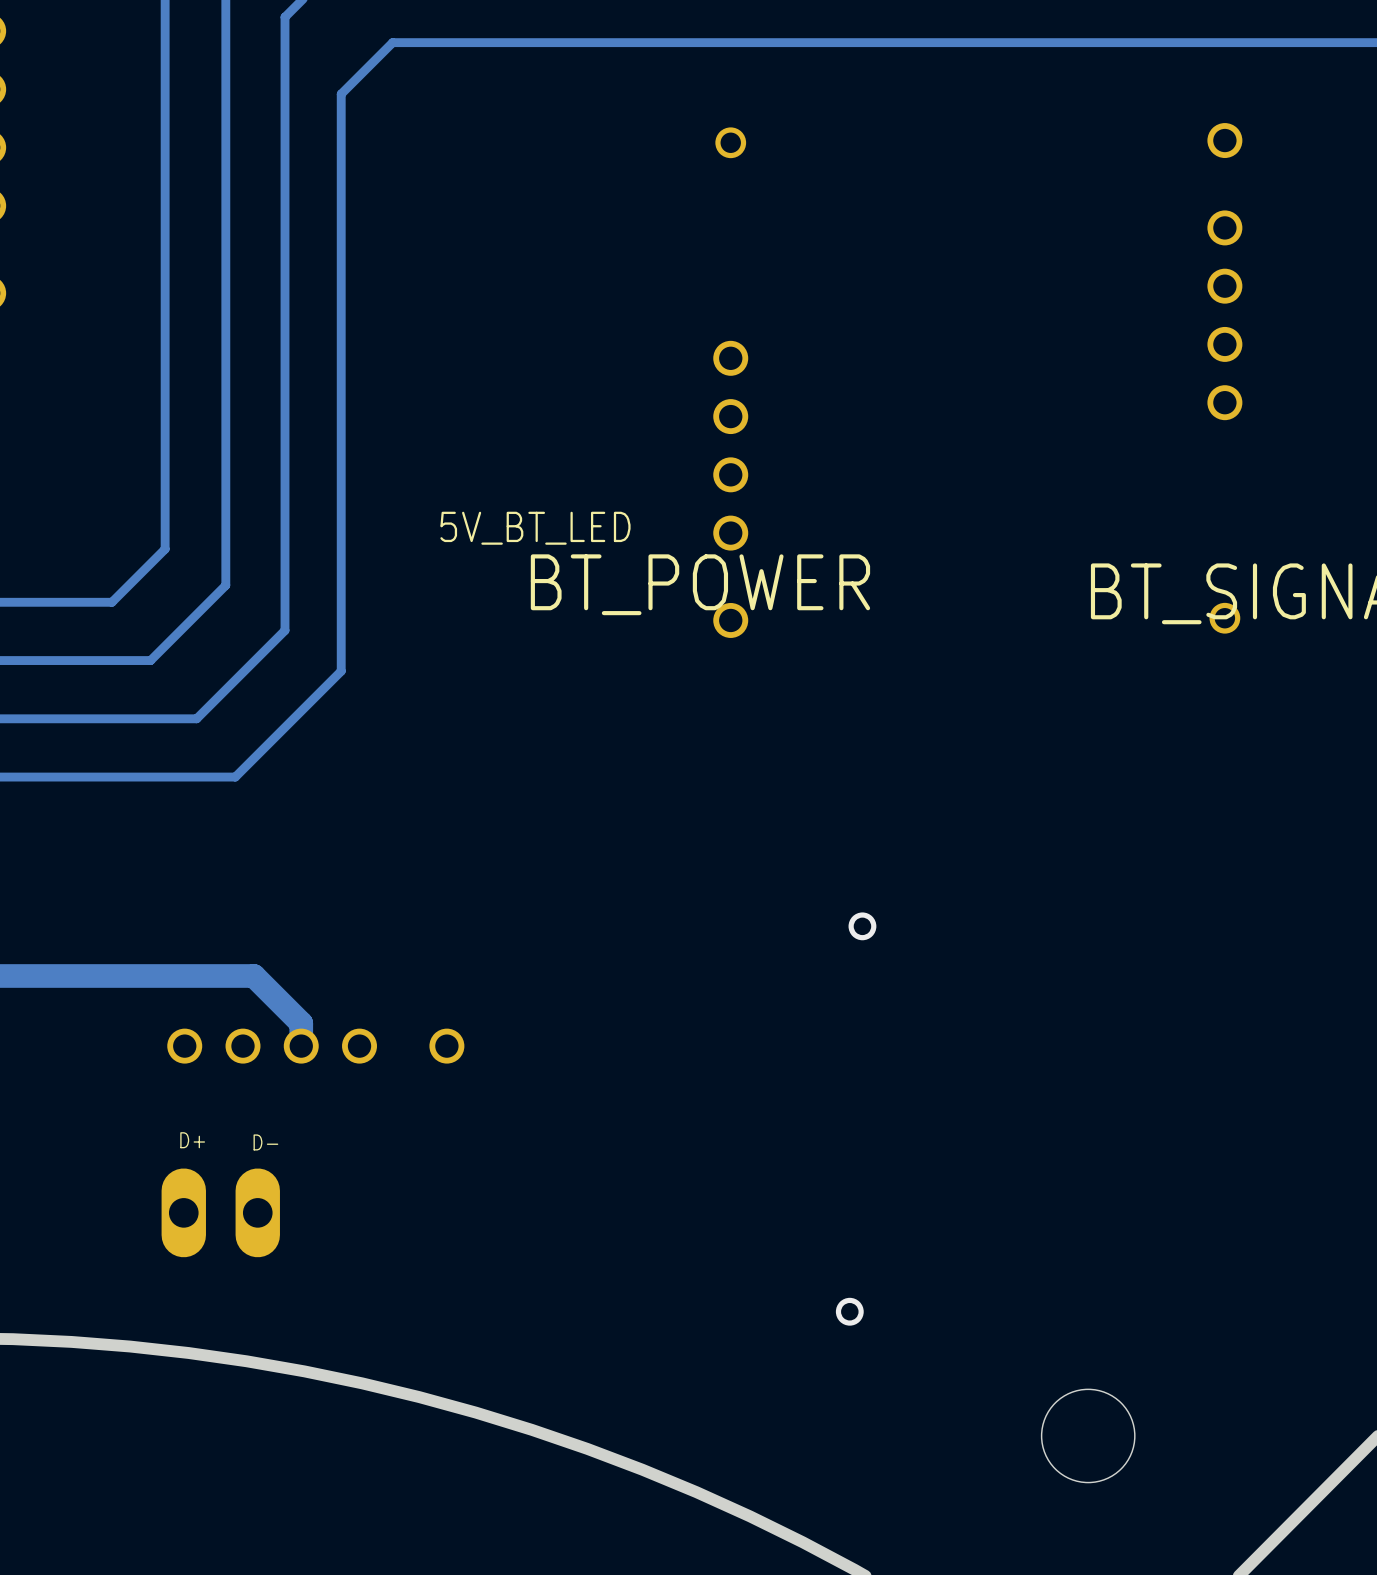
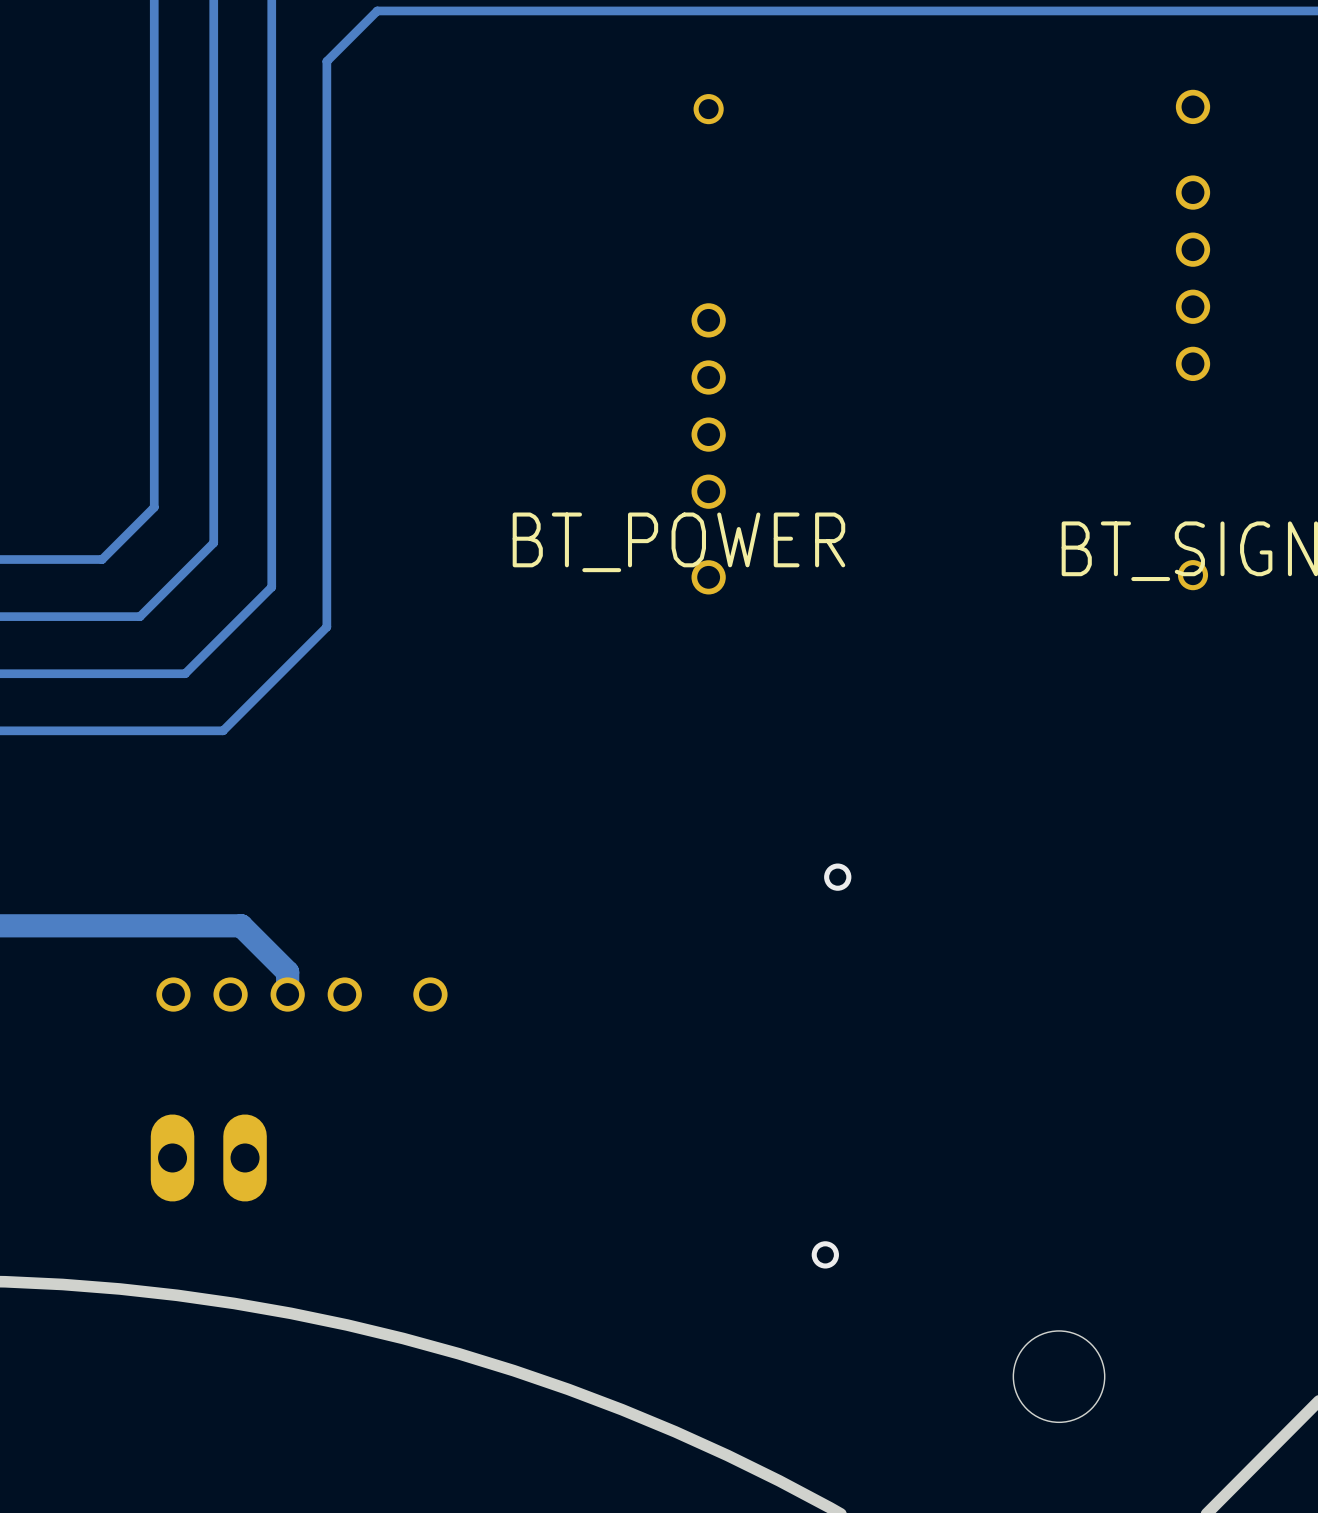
text: 5V_BT_LED (535, 528) -> none
text: D+ (192, 1140) -> none
text: D- (265, 1142) -> none

